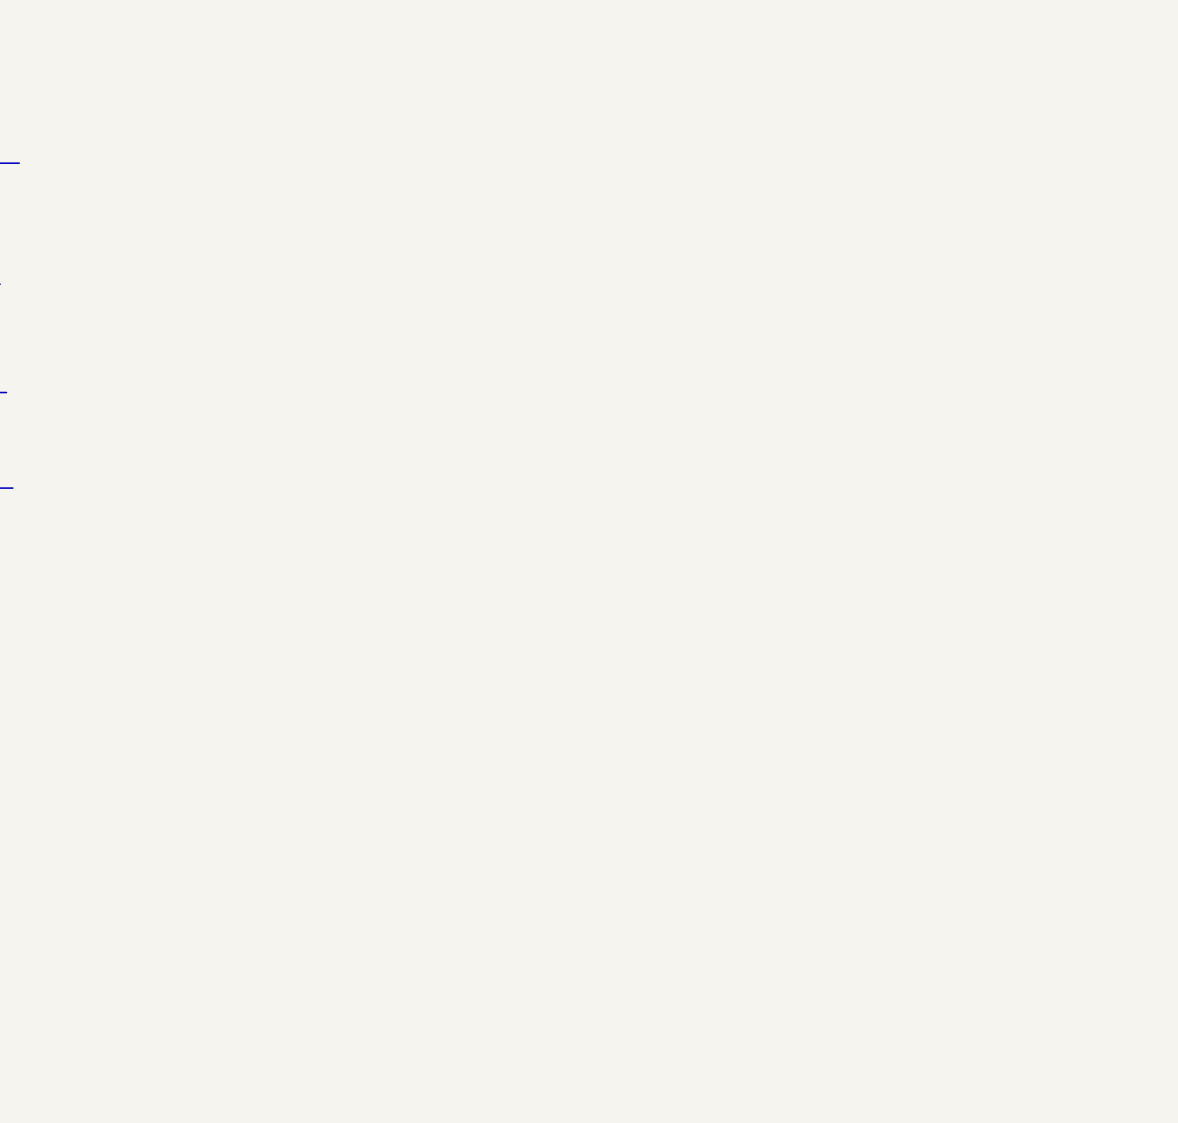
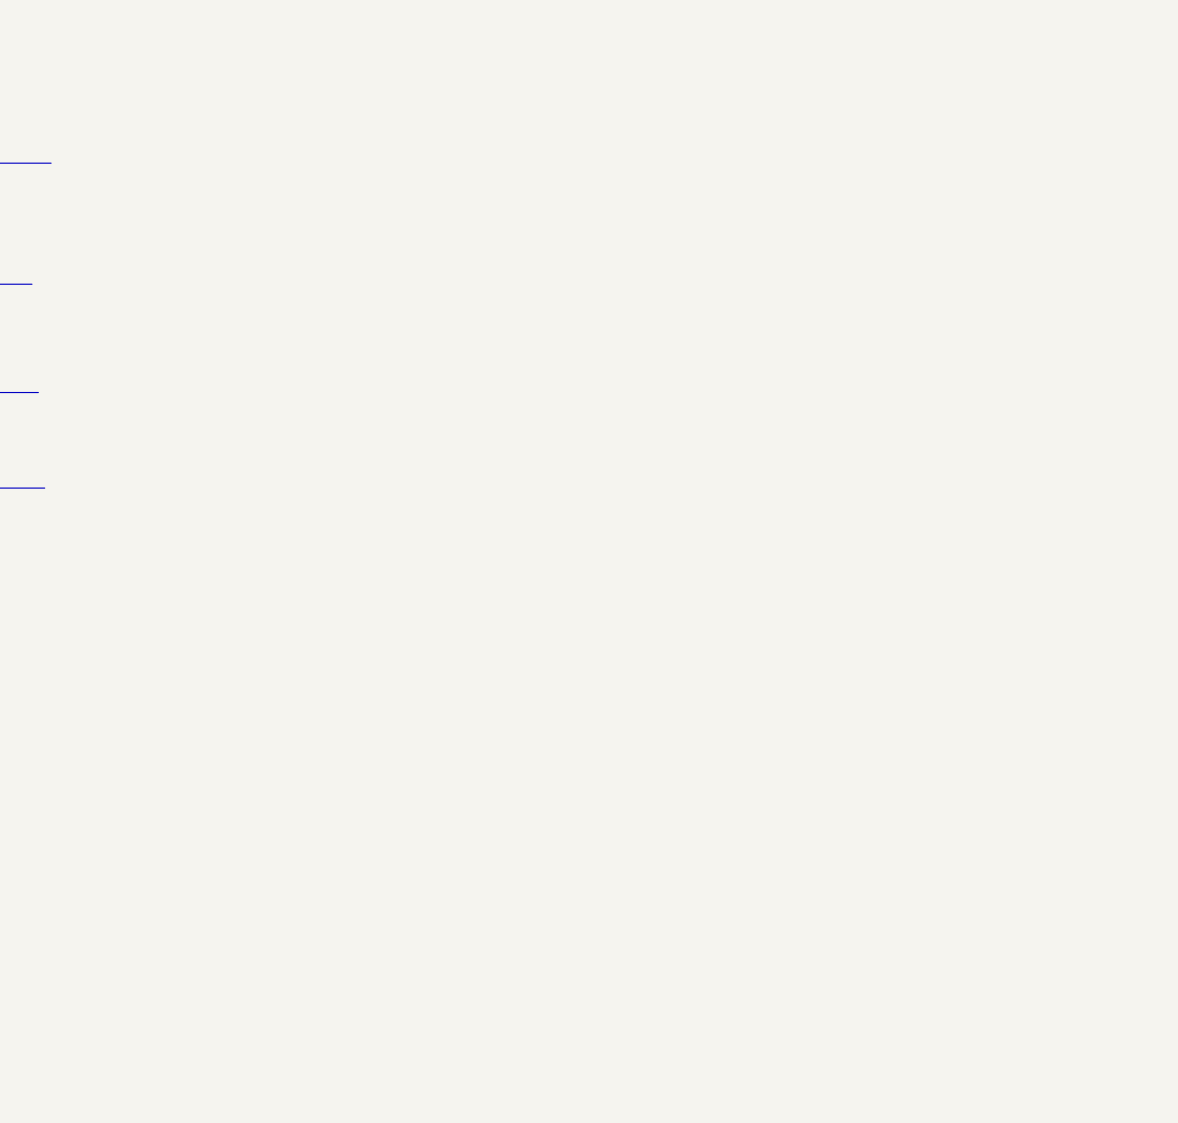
bus: none -> (19, 163) (51, 163)
bus: none -> (0, 284) (31, 284)
bus: none -> (6, 392) (38, 392)
bus: none -> (12, 488) (44, 488)

